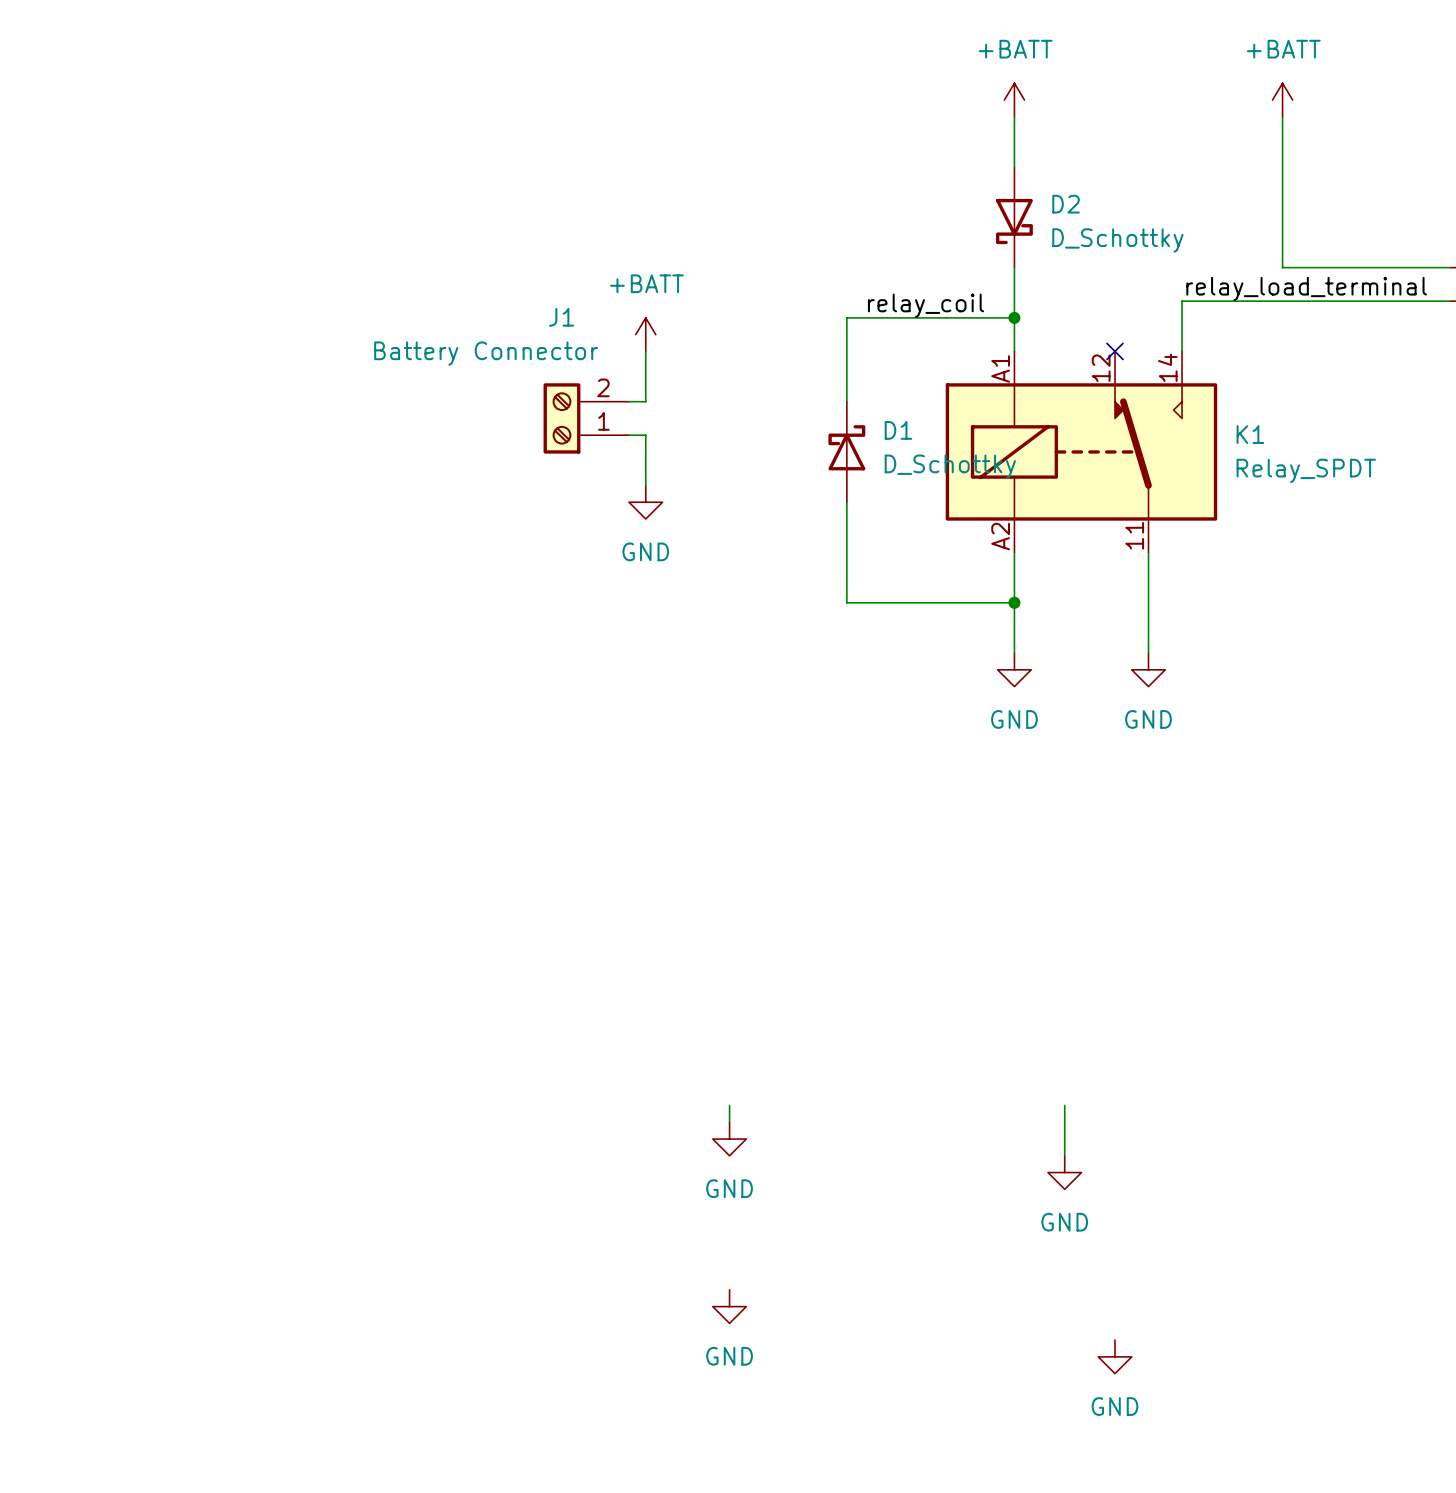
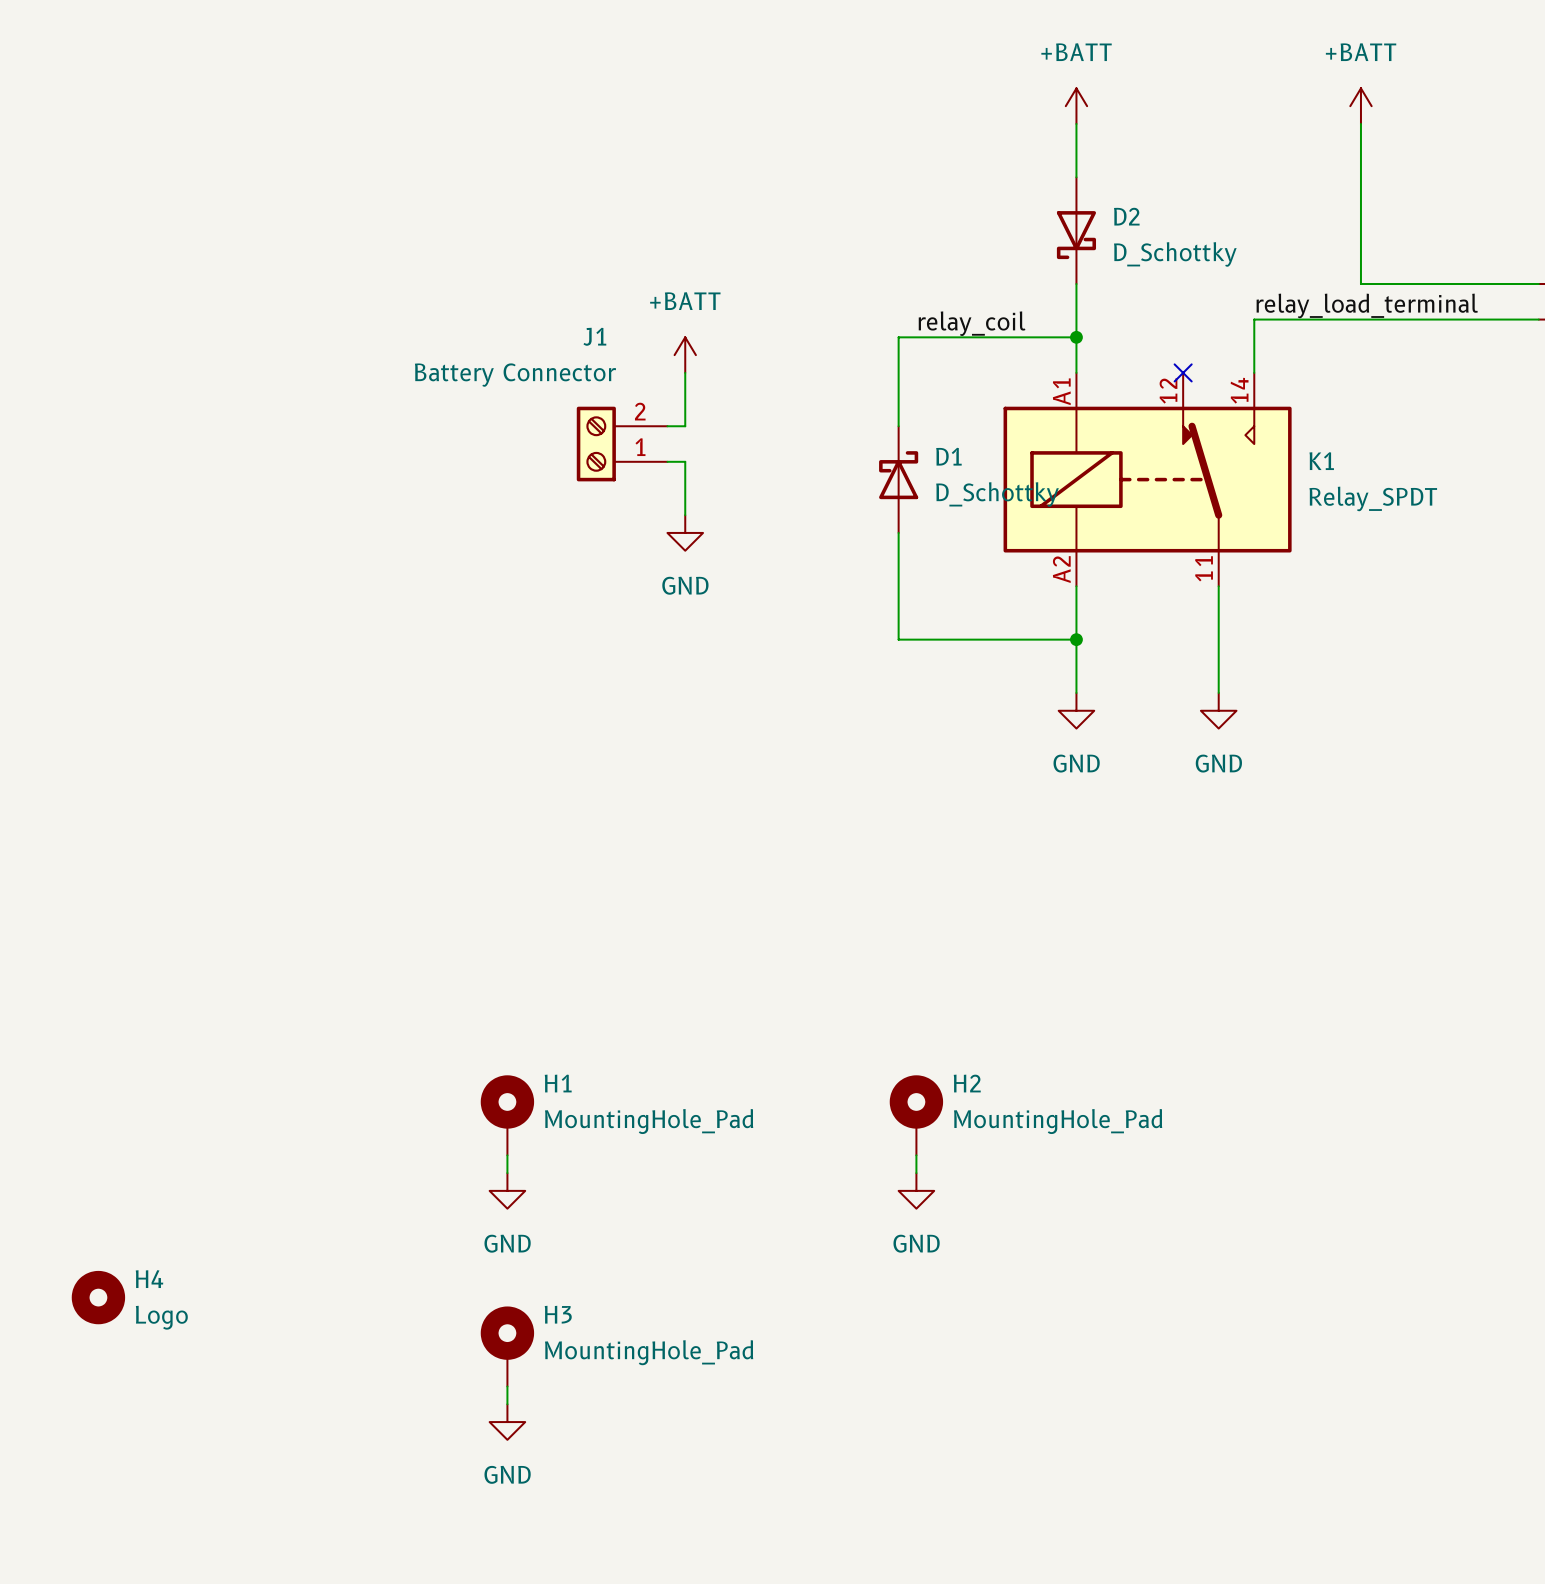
H1: none -> MountingHole_Pad (507, 1115)
H2: none -> MountingHole_Pad (916, 1115)
wire: none -> (507, 1155) (507, 1173)
wire: (729, 1105) (729, 1122) -> (916, 1155) (916, 1173)
wire: (1064, 1105) (1064, 1155) -> none
power symbol: none -> GND (507, 1190)
power symbol: none -> GND (916, 1190)
power symbol: GND (729, 1139) -> none
power symbol: GND (1064, 1172) -> none
H4: none -> Logo (98, 1297)
H3: none -> MountingHole_Pad (507, 1346)
wire: none -> (507, 1386) (507, 1404)
power symbol: GND (729, 1306) -> none
power symbol: none -> GND (507, 1422)
power symbol: GND (1114, 1356) -> none

